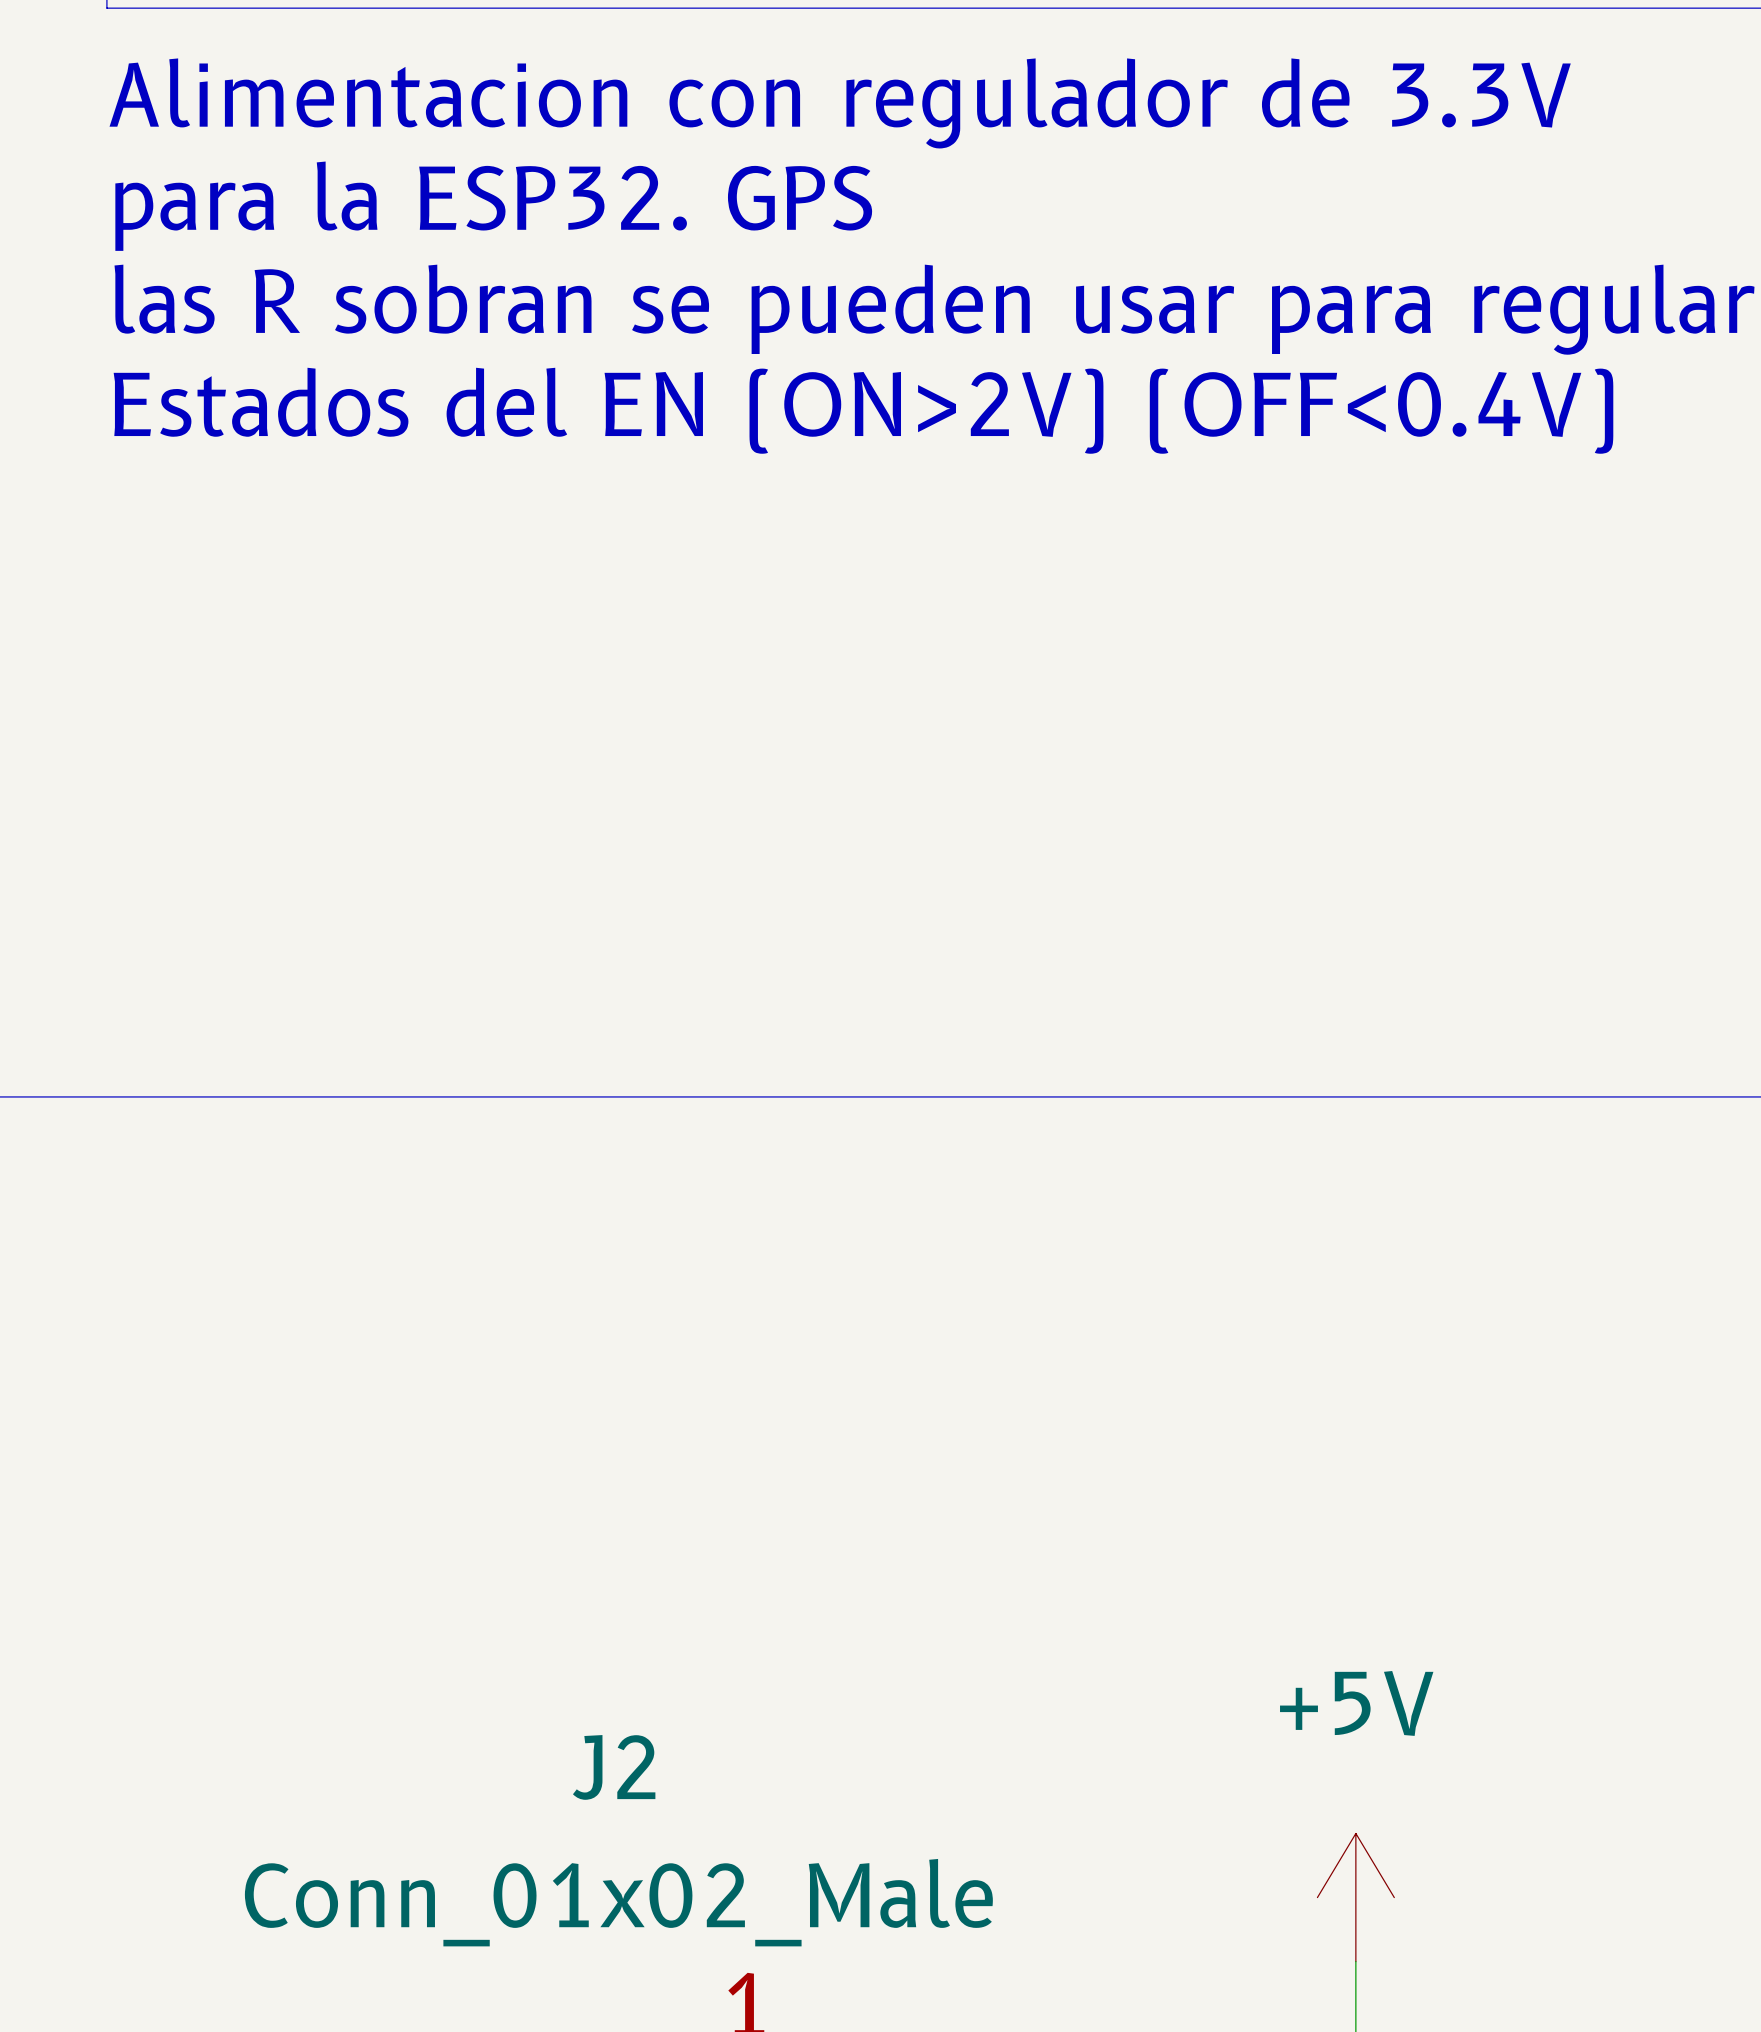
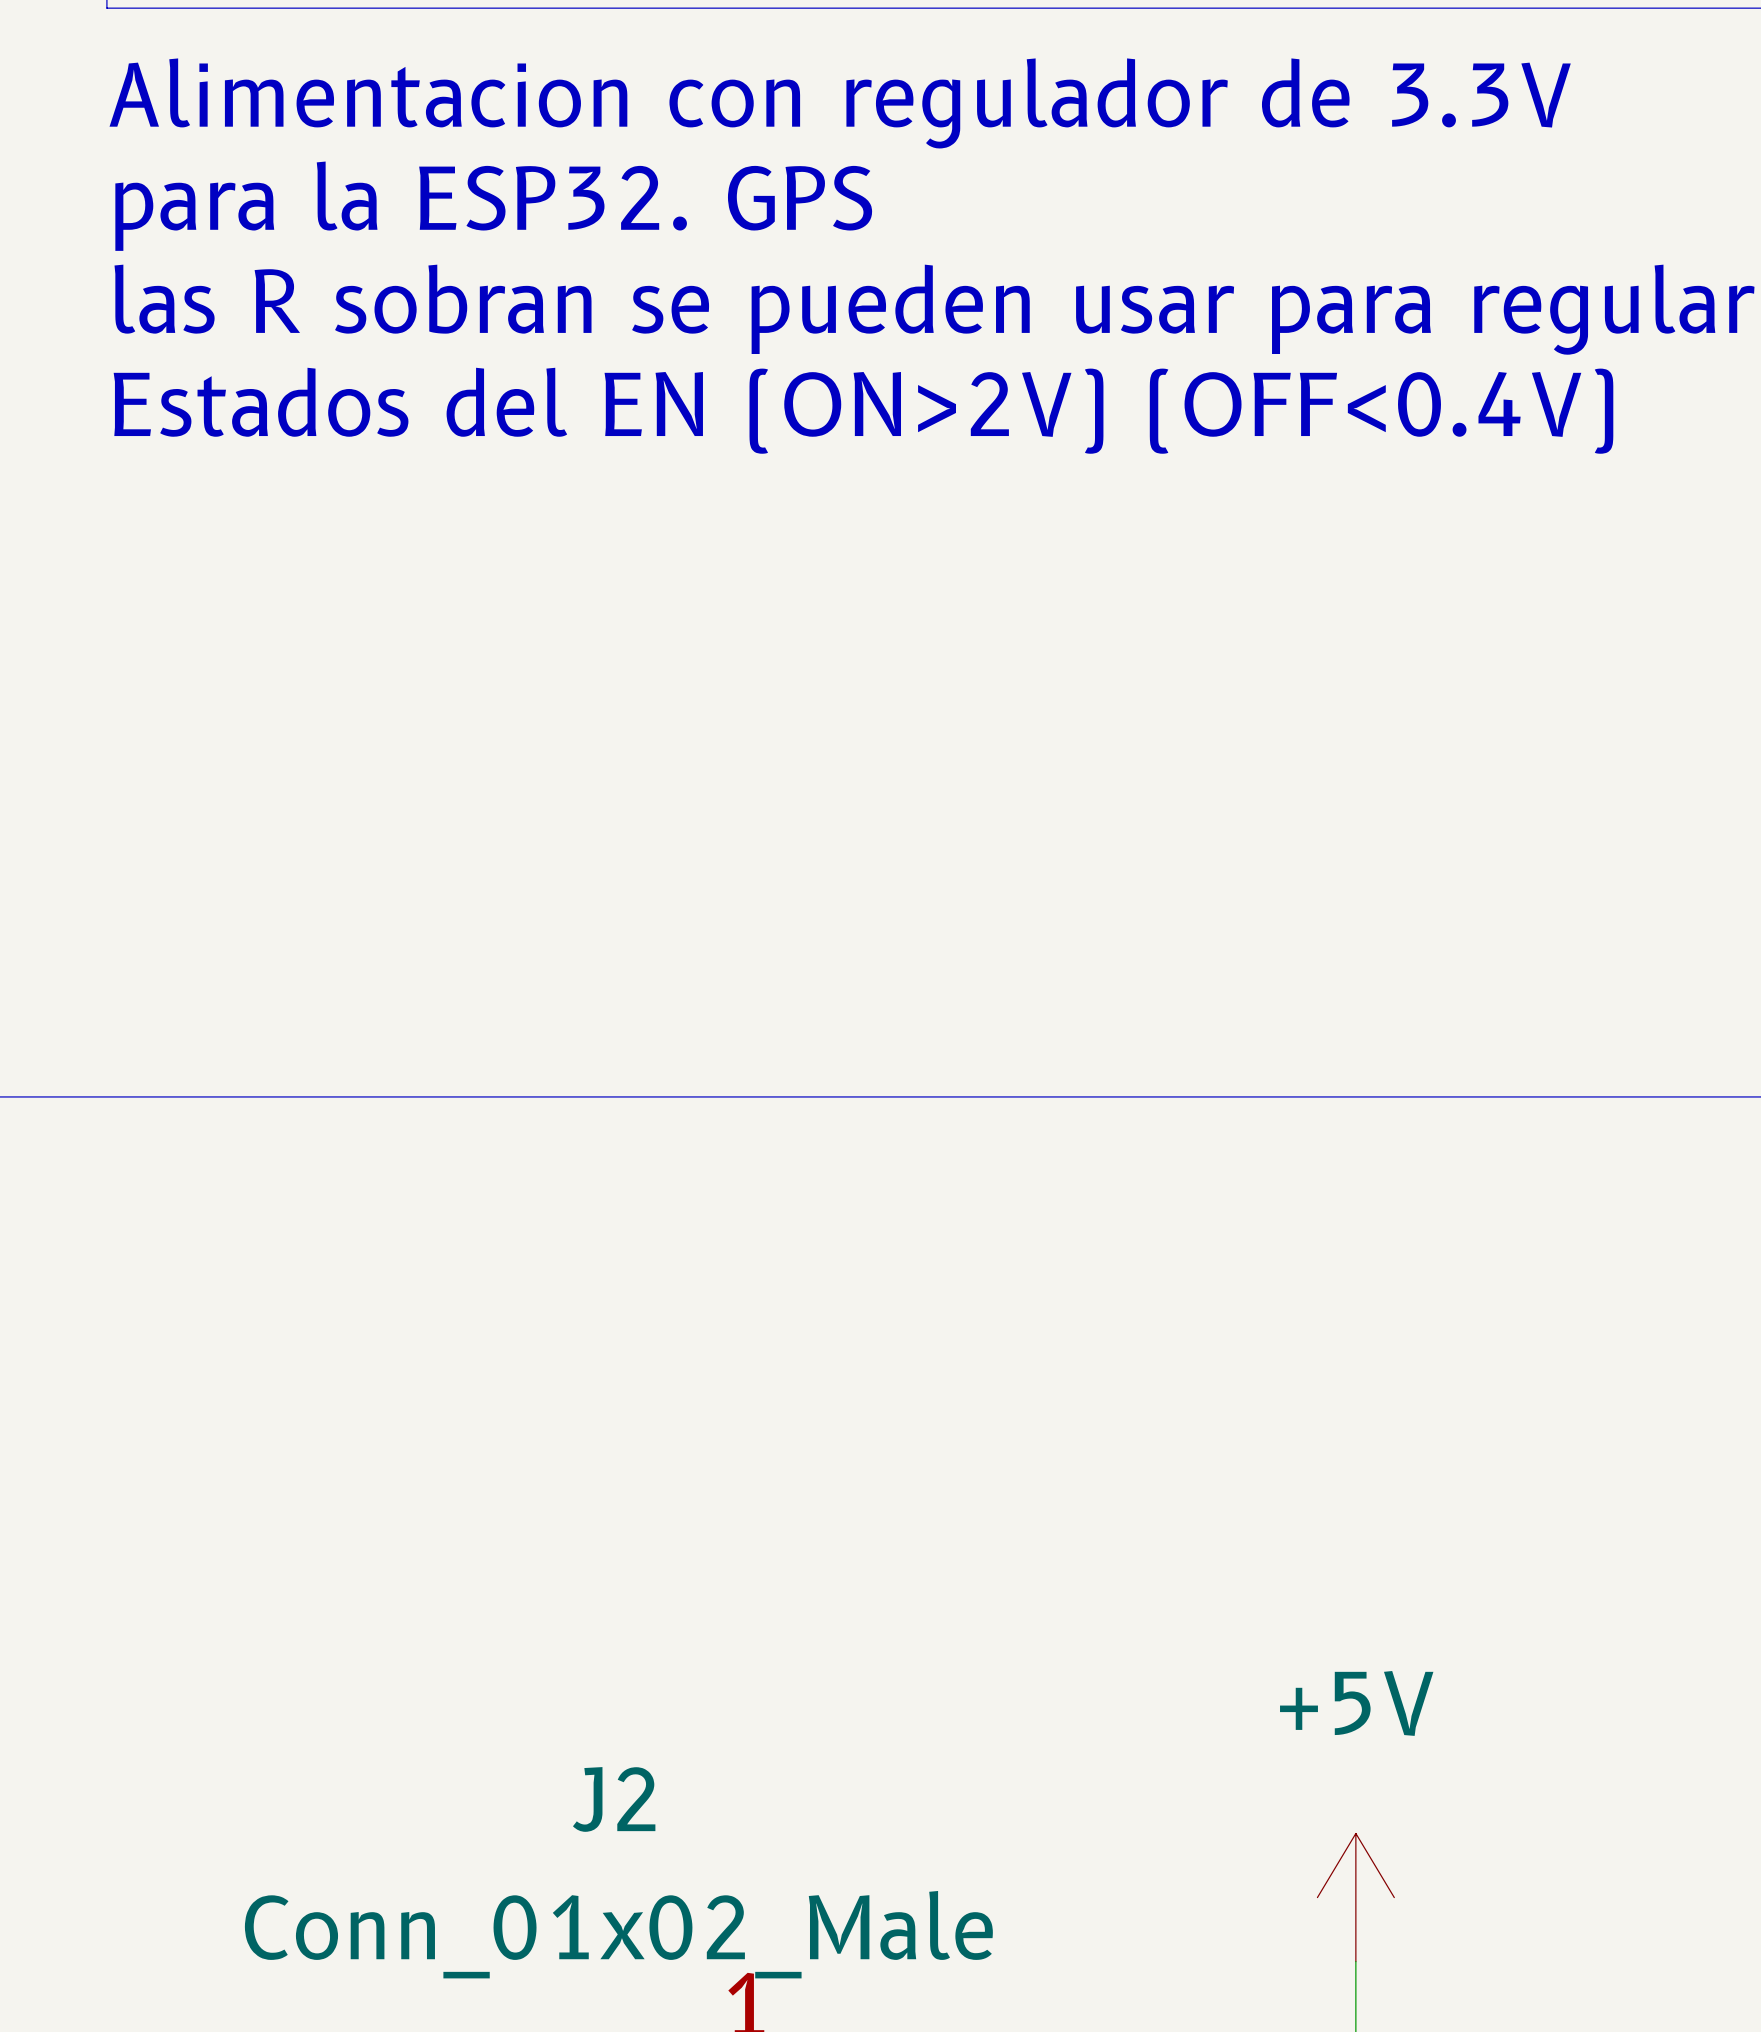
J2 name position: J2 (614, 1767) -> J2 (614, 1799)
J2 value position: Conn_01x02_Male (618, 1902) -> Conn_01x02_Male (618, 1934)

